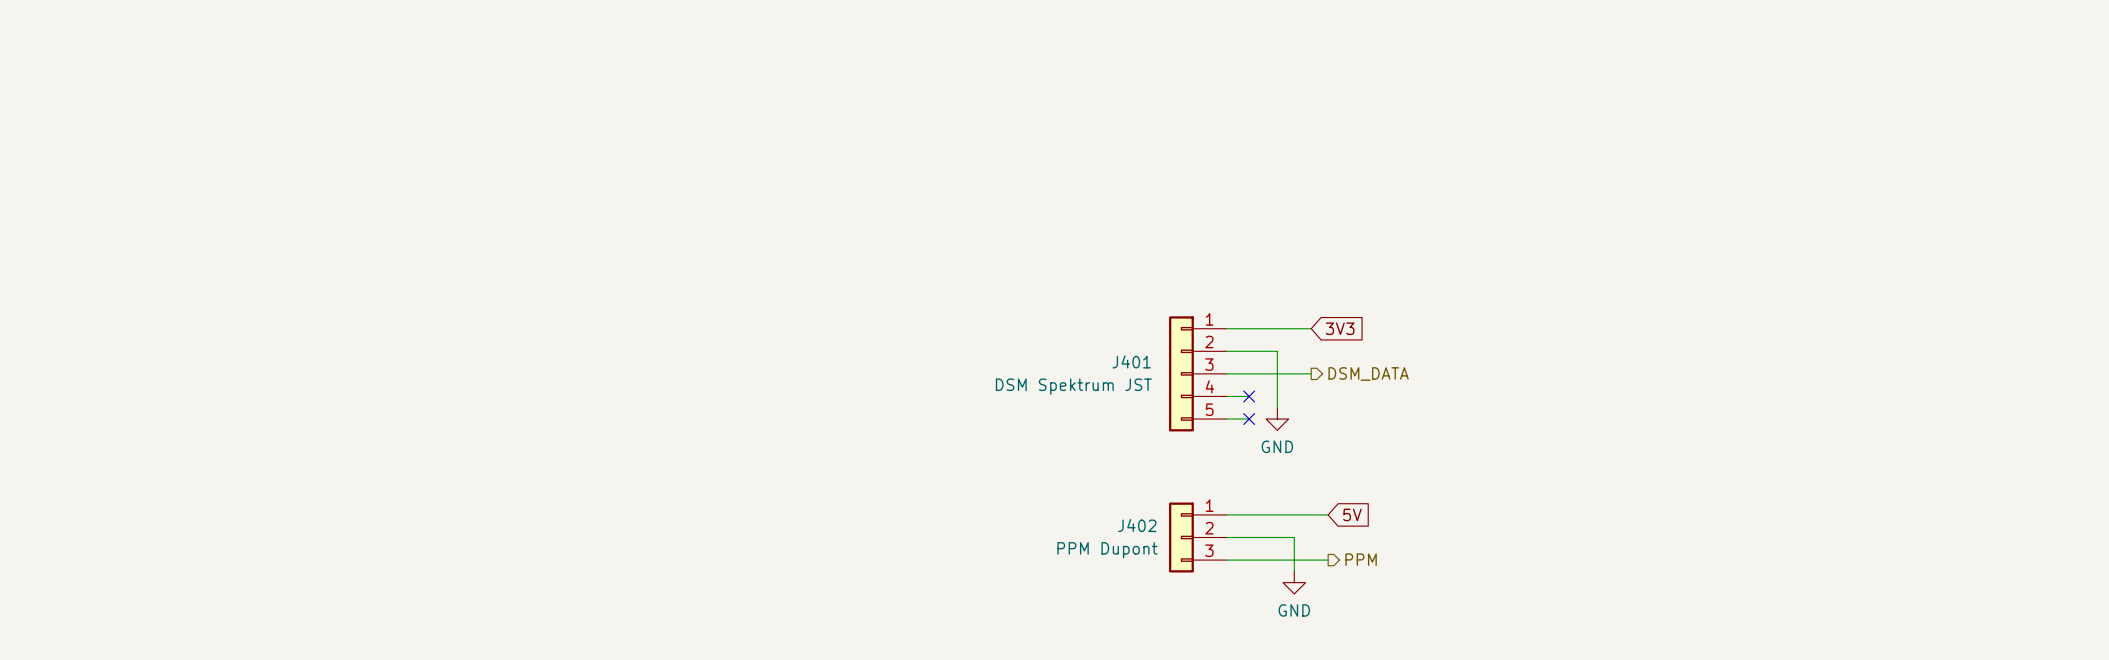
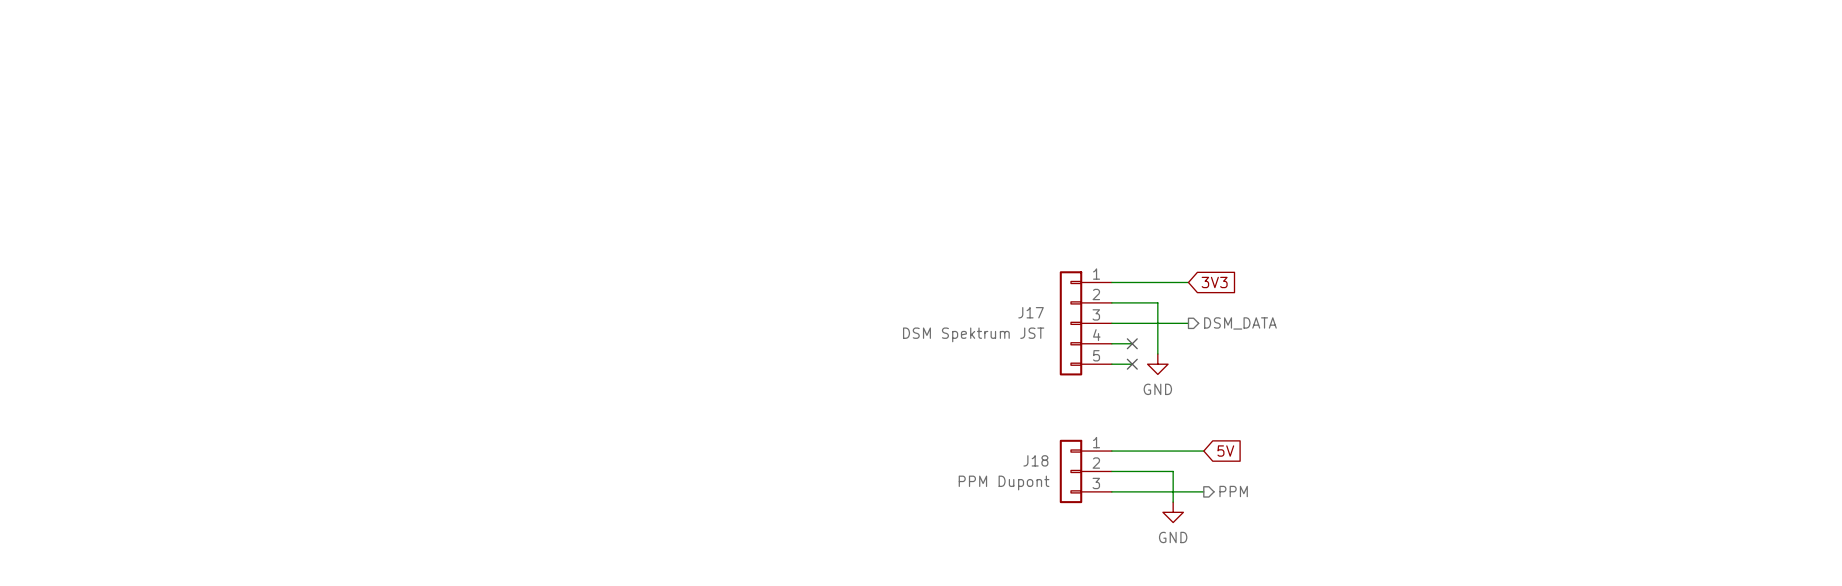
J401 name: J401 (1131, 361) -> J17 (1031, 312)
J402 name: J402 (1137, 525) -> J18 (1035, 460)

